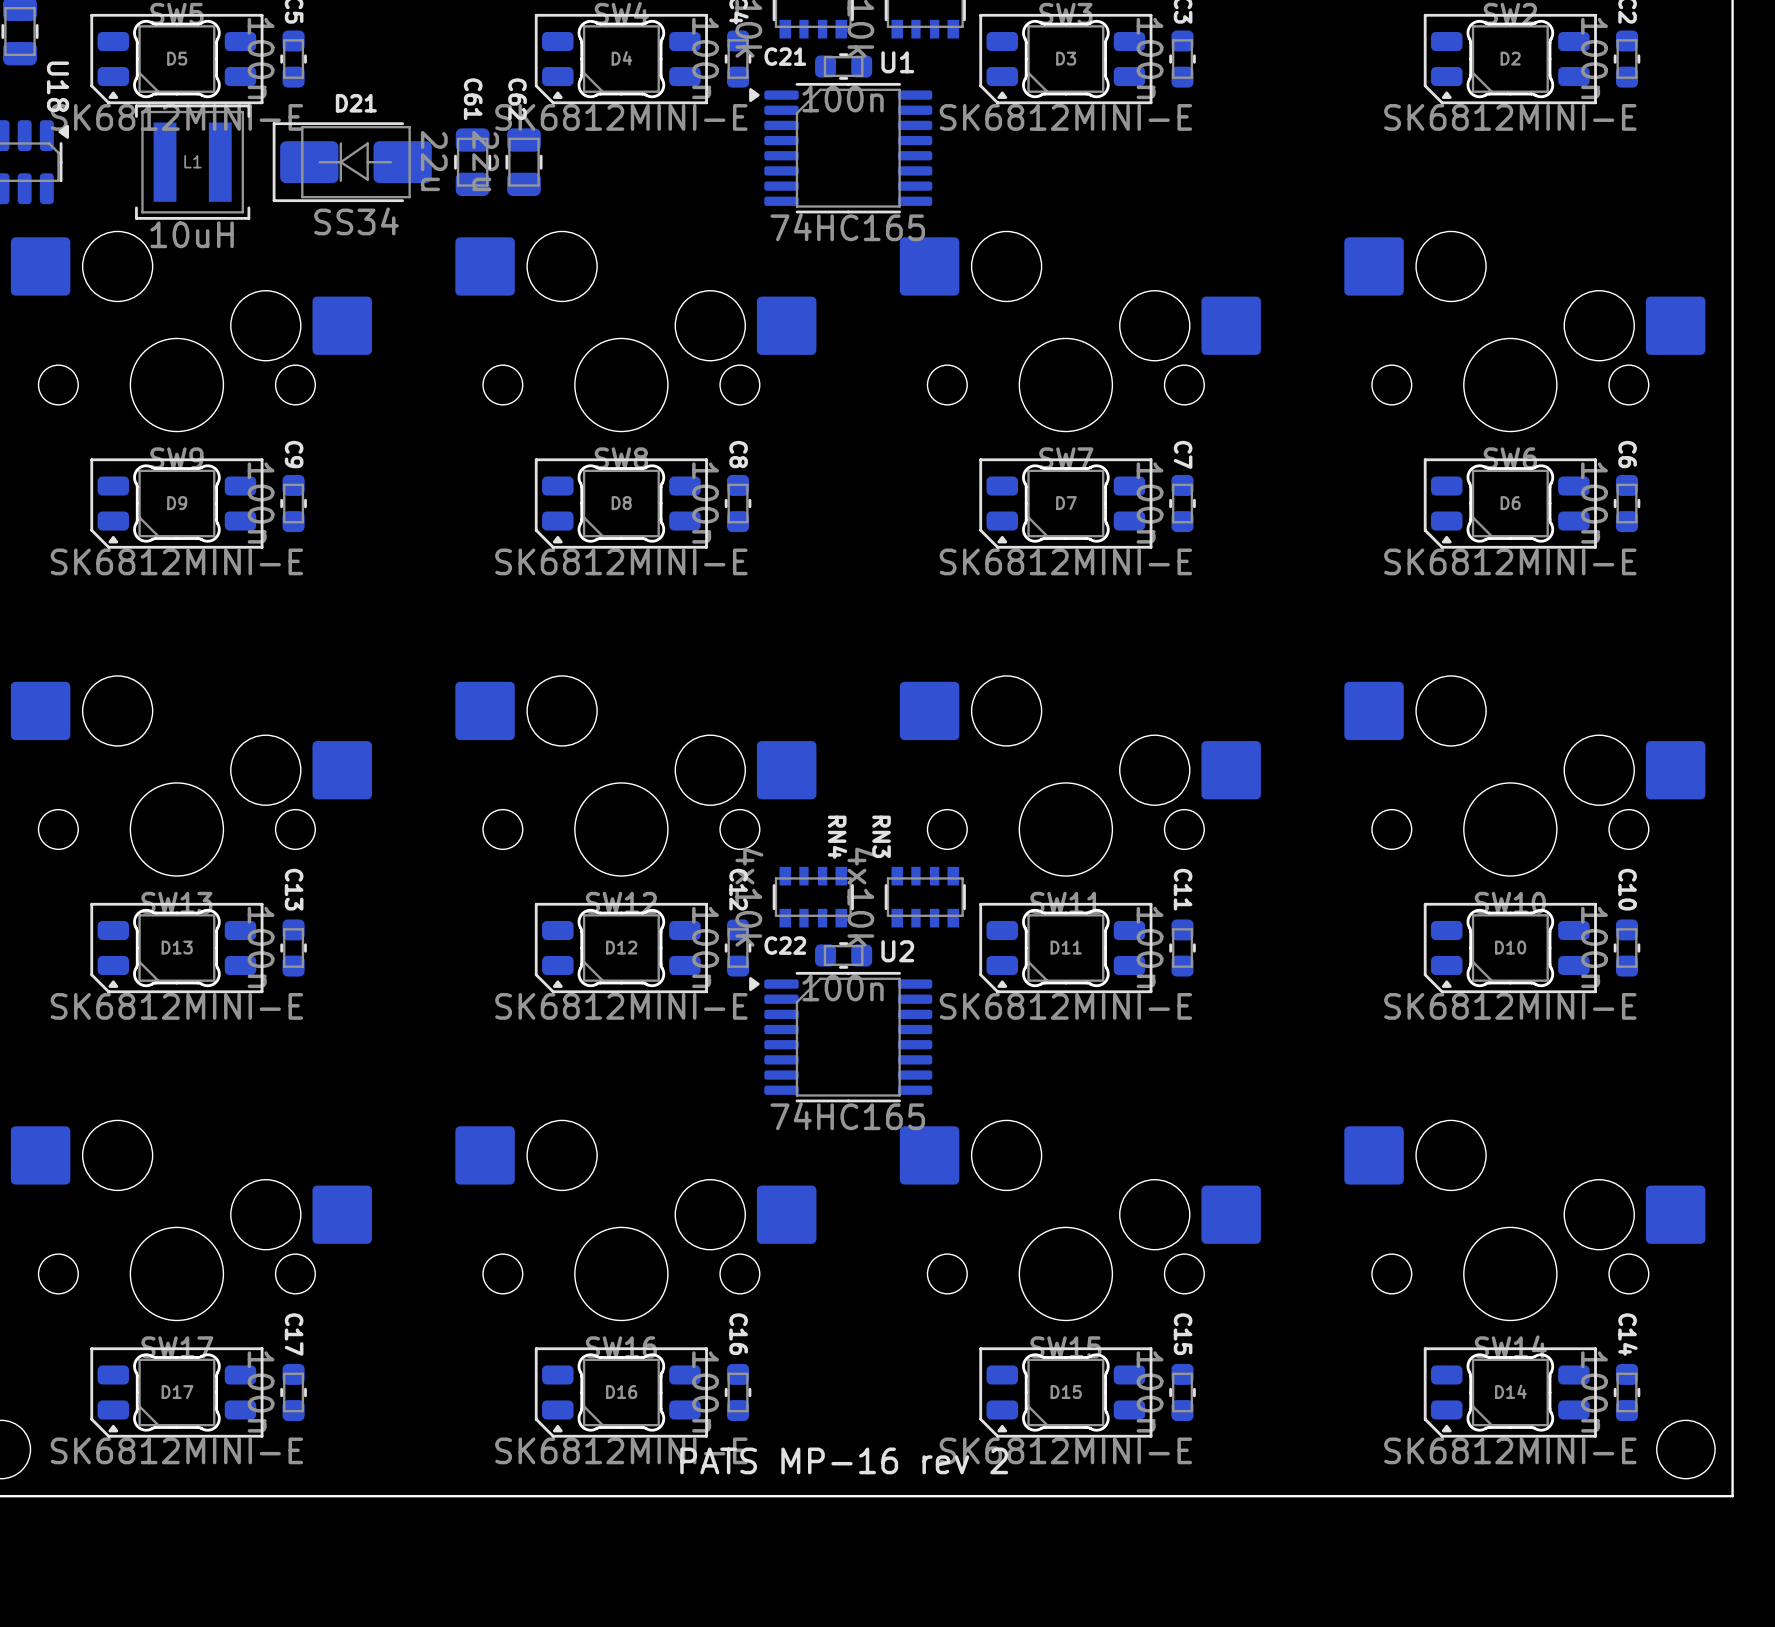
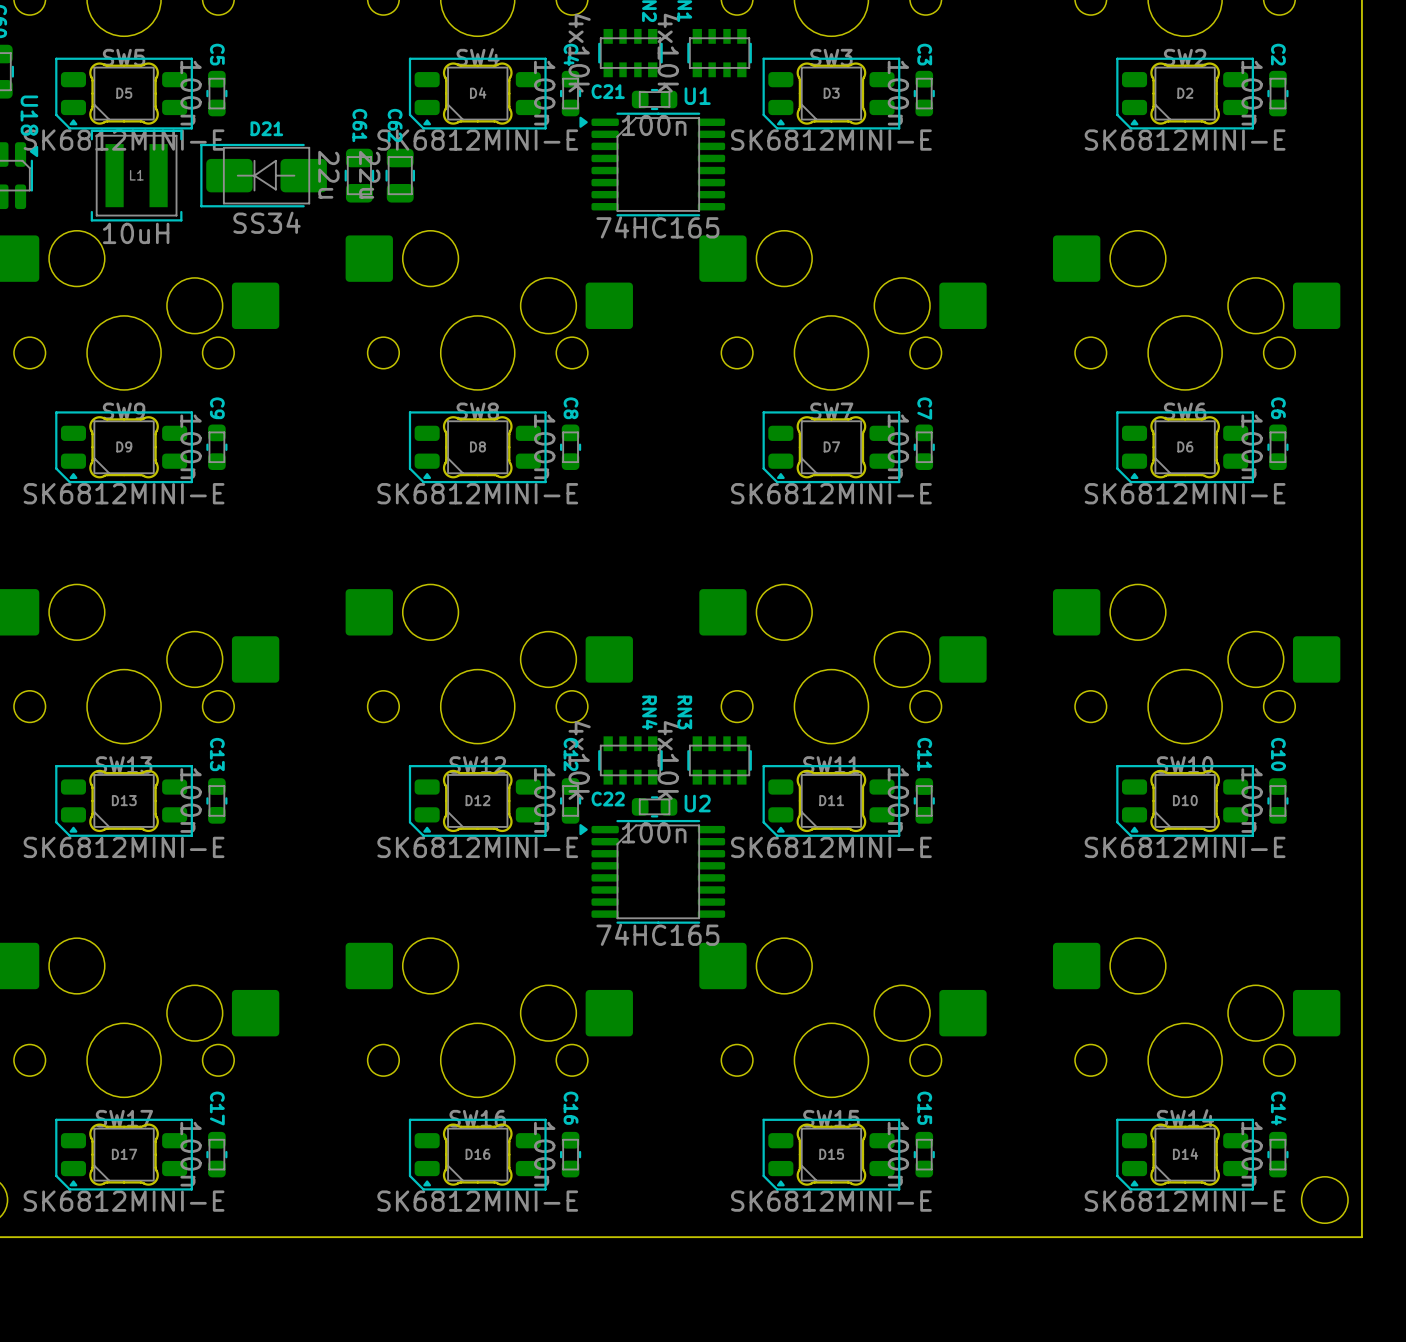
text: PATS MP-16 rev 2 (844, 1460) -> none

